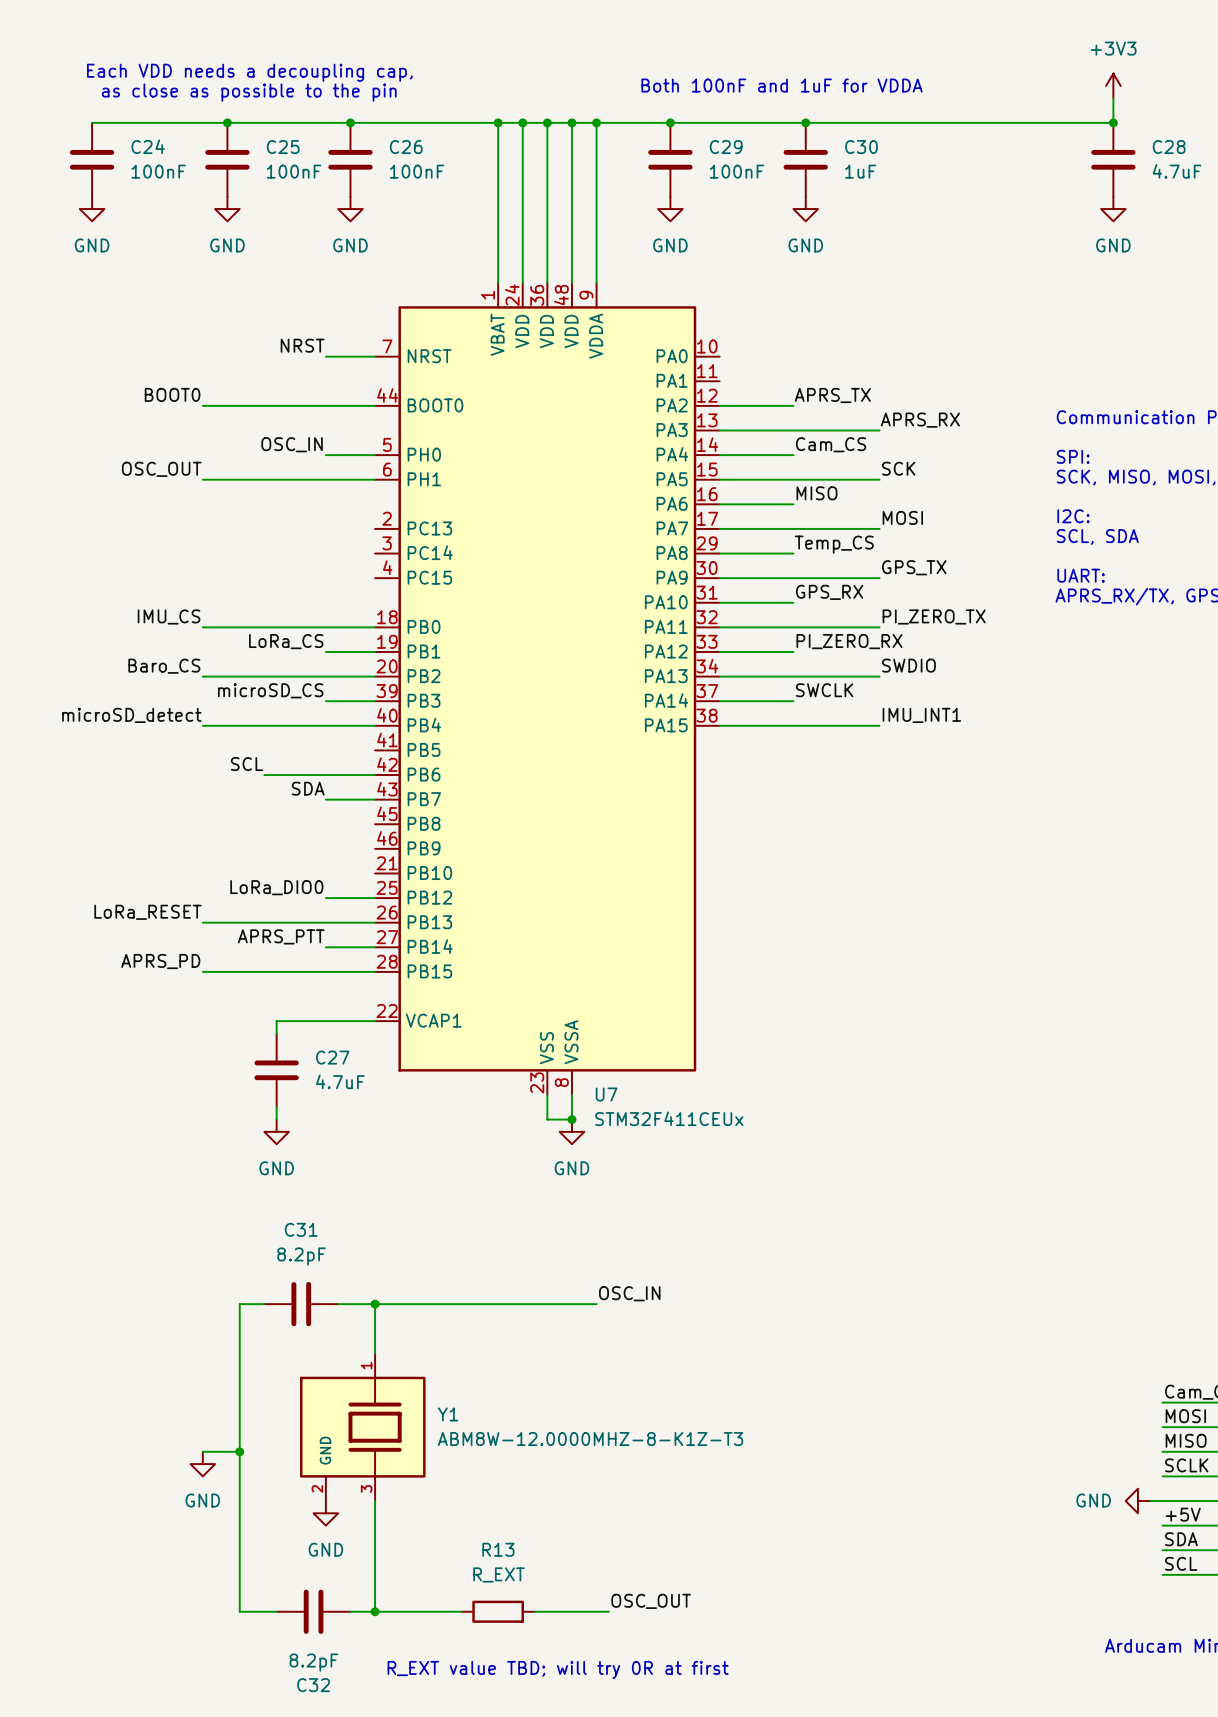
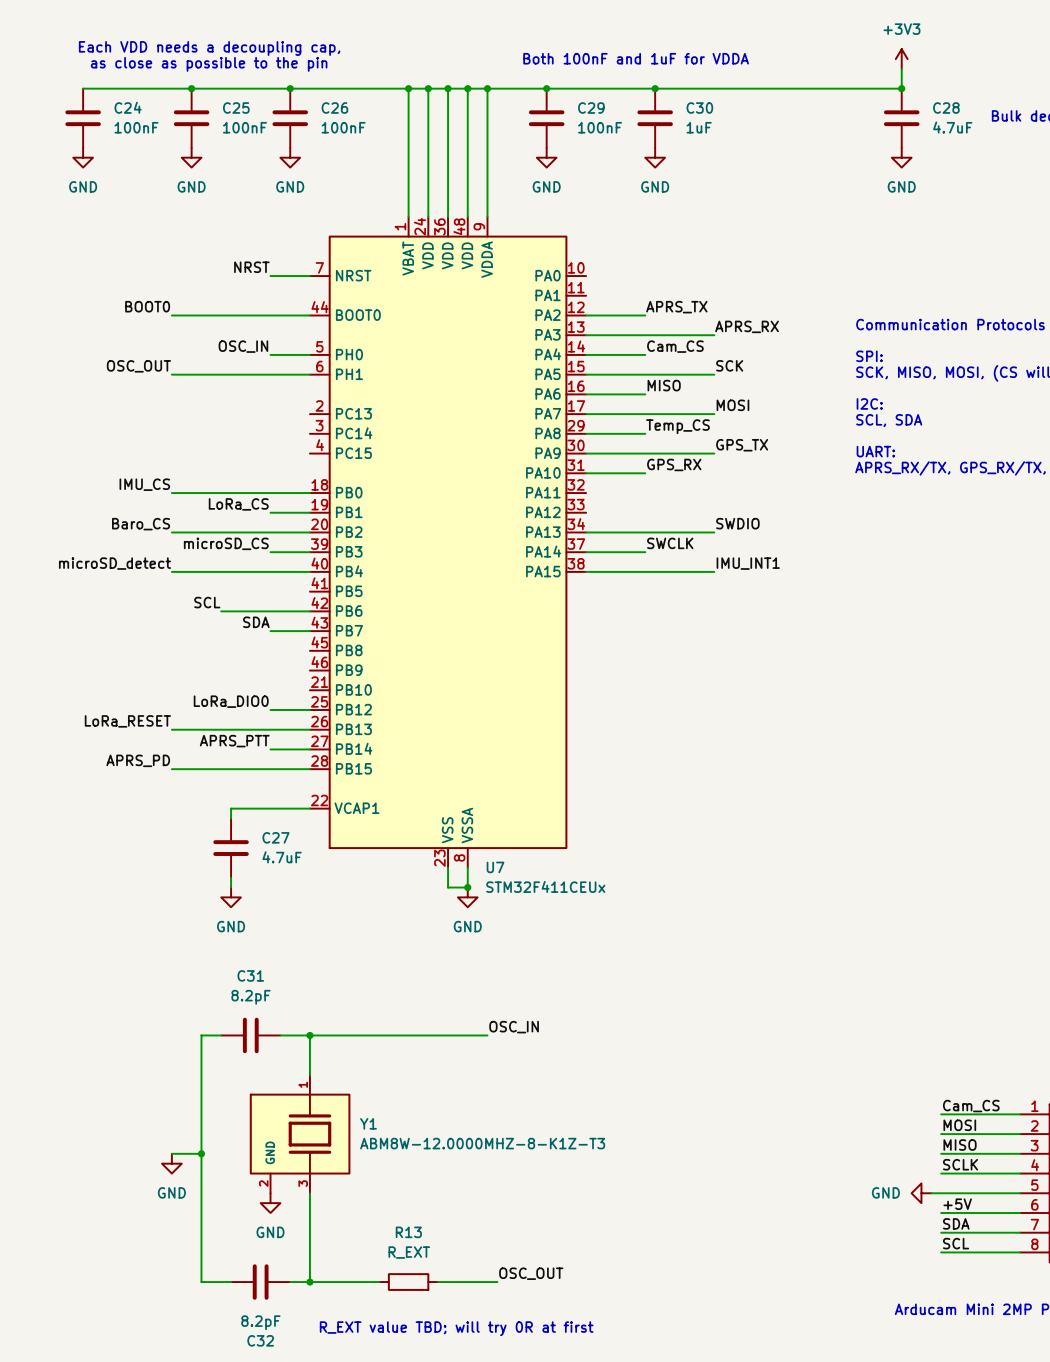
label: PI_ZERO_TX (934, 616) -> none
wire: (719, 627) (879, 627) -> none
label: PI_ZERO_RX (849, 641) -> none
wire: (719, 651) (793, 651) -> none

